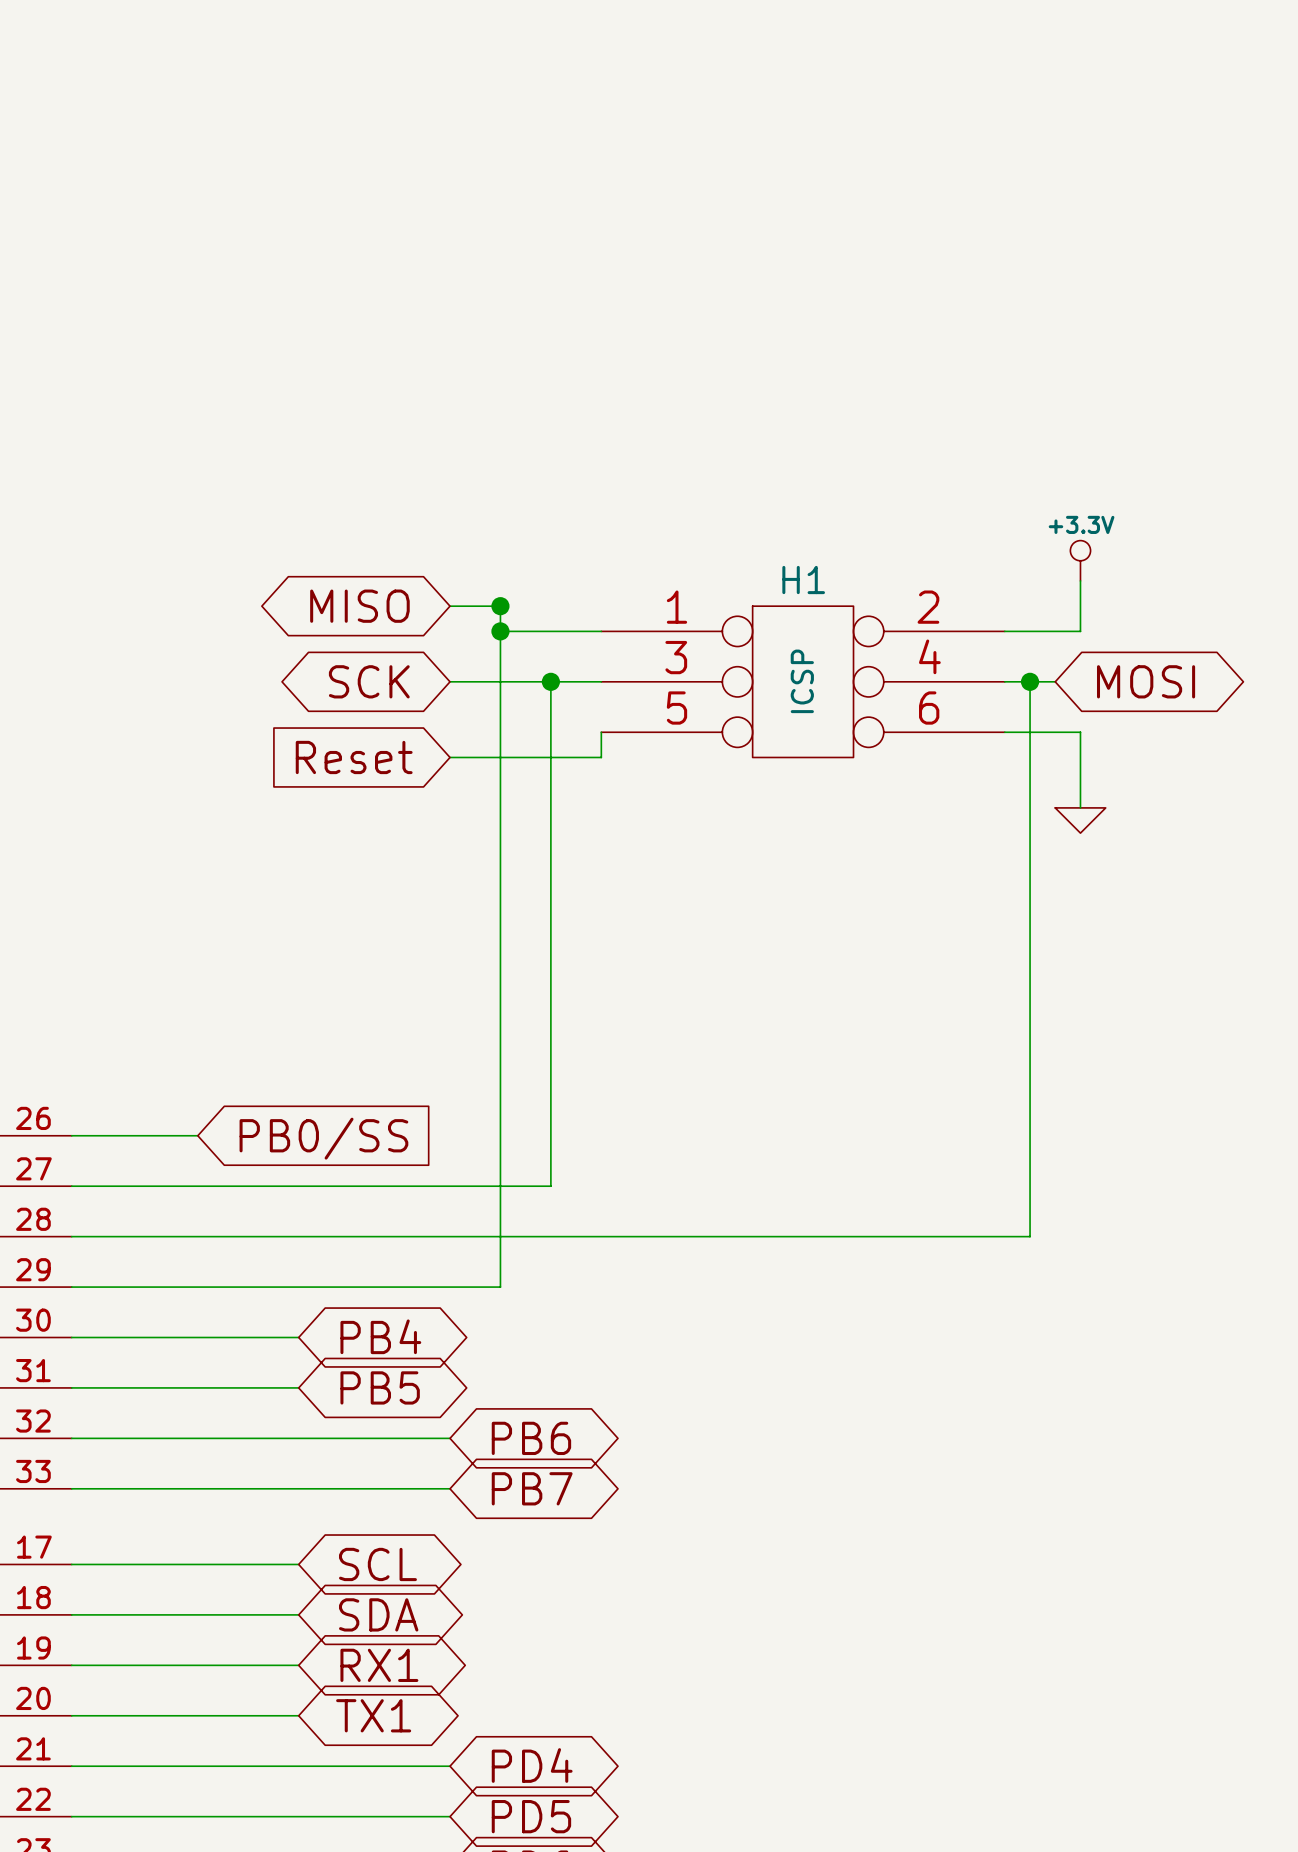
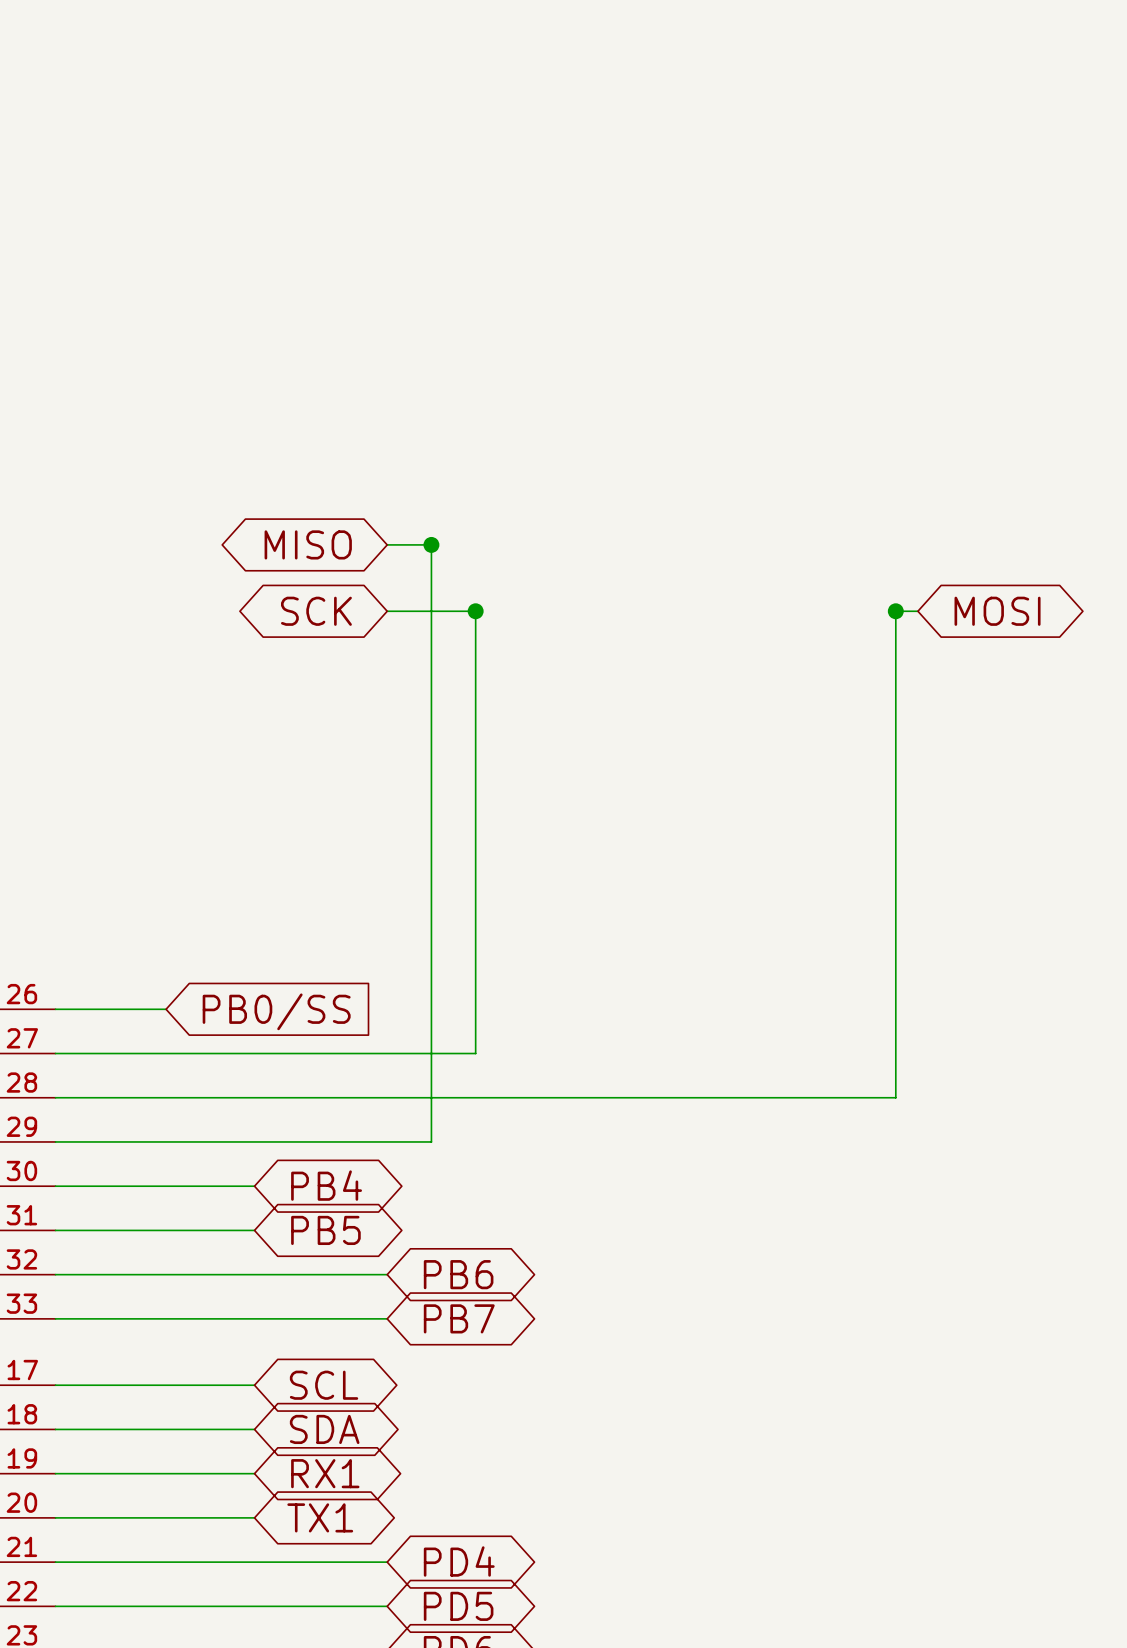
power symbol: +3.3V (1080, 560) -> none
wire: (1080, 580) (1080, 631) (1004, 631) -> none
wire: (500, 631) (601, 631) -> none
junction: (500, 631) -> none
wire: (550, 681) (601, 681) -> none
H1: ICSP (803, 681) -> none
wire: (1004, 681) (1030, 681) -> none
wire: (601, 732) (601, 757) (450, 757) -> none
wire: (1004, 732) (1080, 732) (1080, 807) -> none
global label: Reset (354, 757) -> none
power symbol: (1080, 820) -> none

